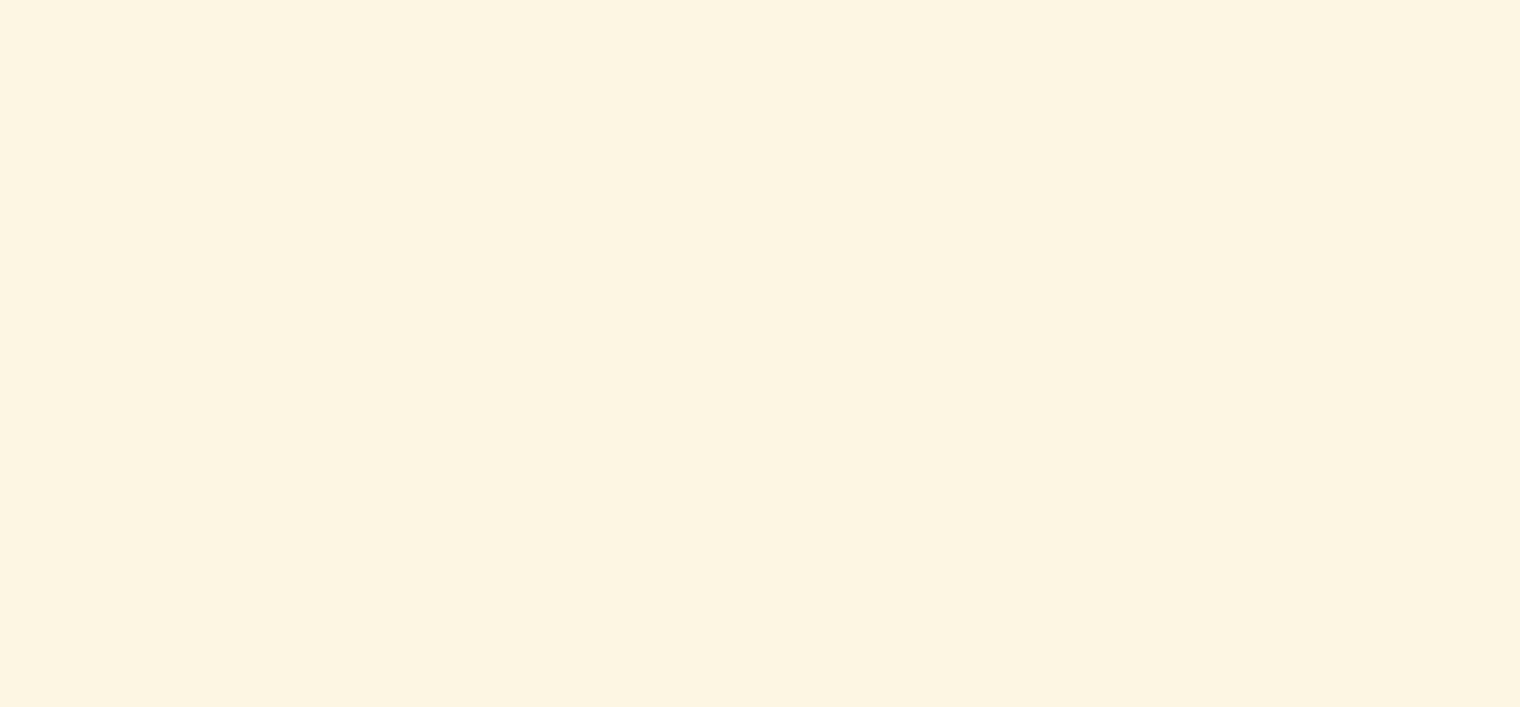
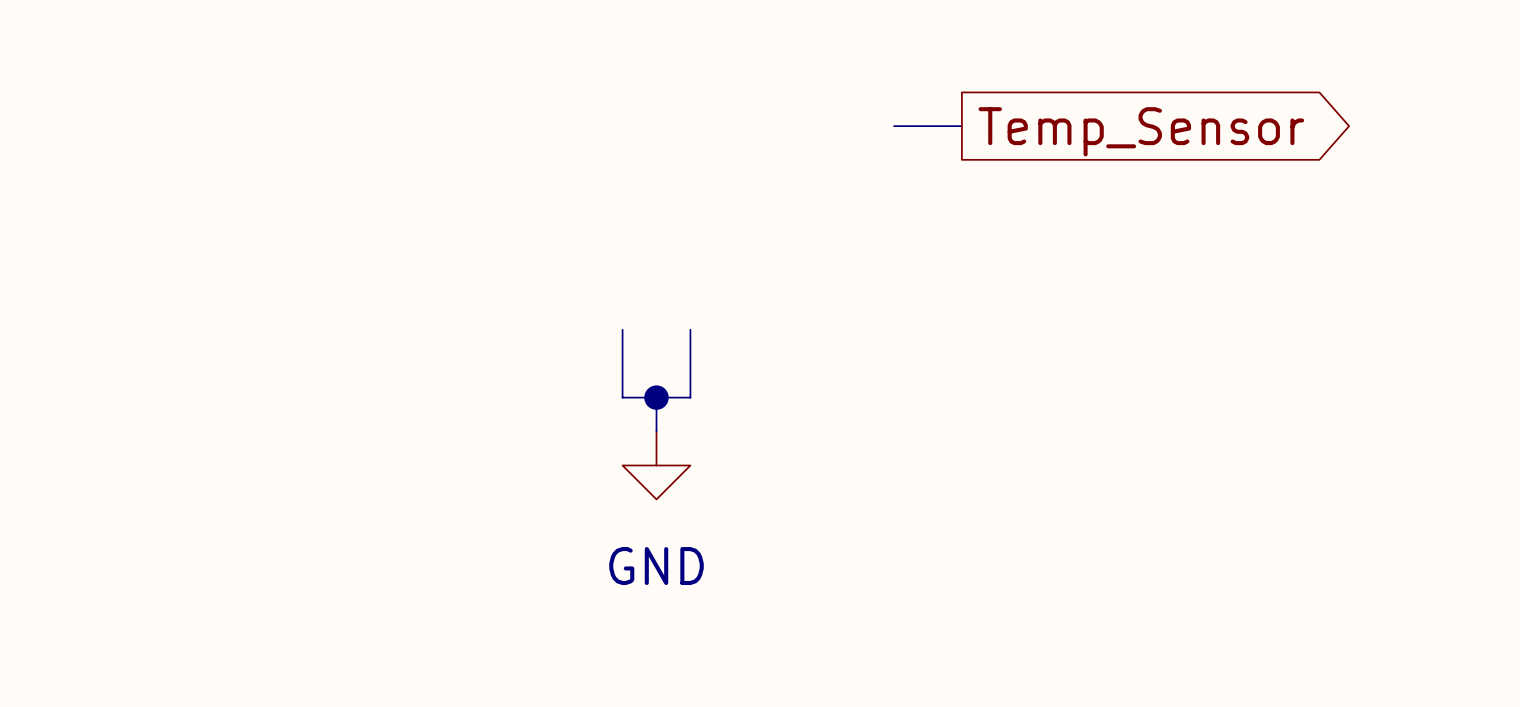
wire: none -> (894, 126) (961, 126)
global label: none -> Temp_Sensor (1141, 131)
wire: none -> (622, 329) (622, 397) (690, 397) (690, 329)
wire: none -> (656, 397) (656, 431)
junction: none -> (656, 397)
power symbol: none -> GND (656, 465)

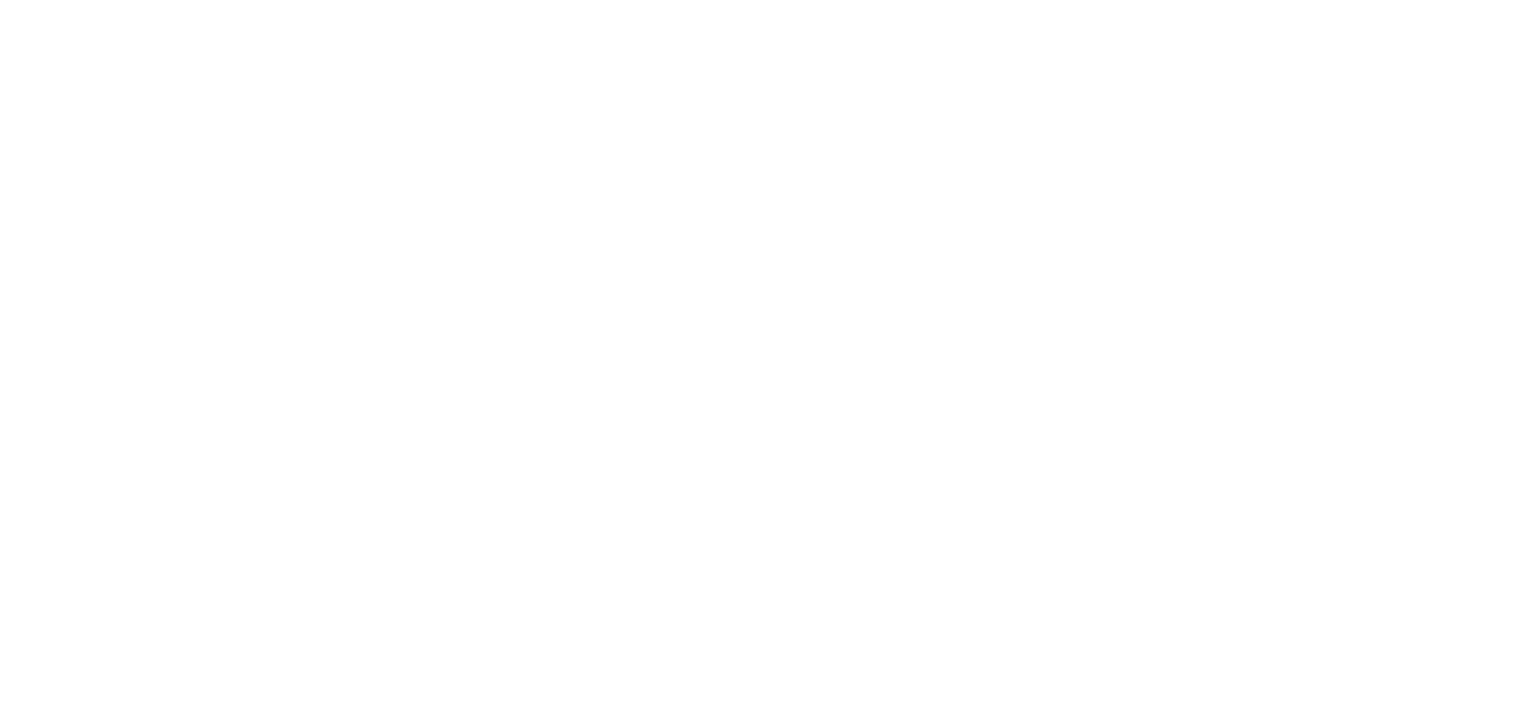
wire: (894, 126) (961, 126) -> none
global label: Temp_Sensor (1141, 131) -> none
wire: (622, 329) (622, 397) (690, 397) (690, 329) -> none
wire: (656, 397) (656, 431) -> none
junction: (656, 397) -> none
power symbol: GND (656, 465) -> none

